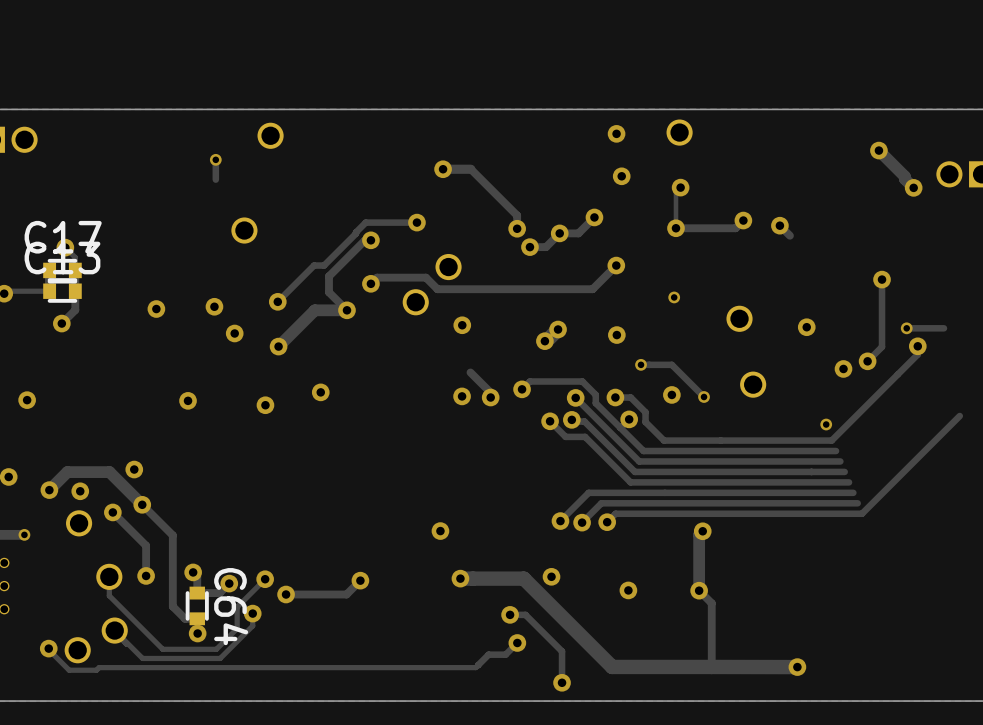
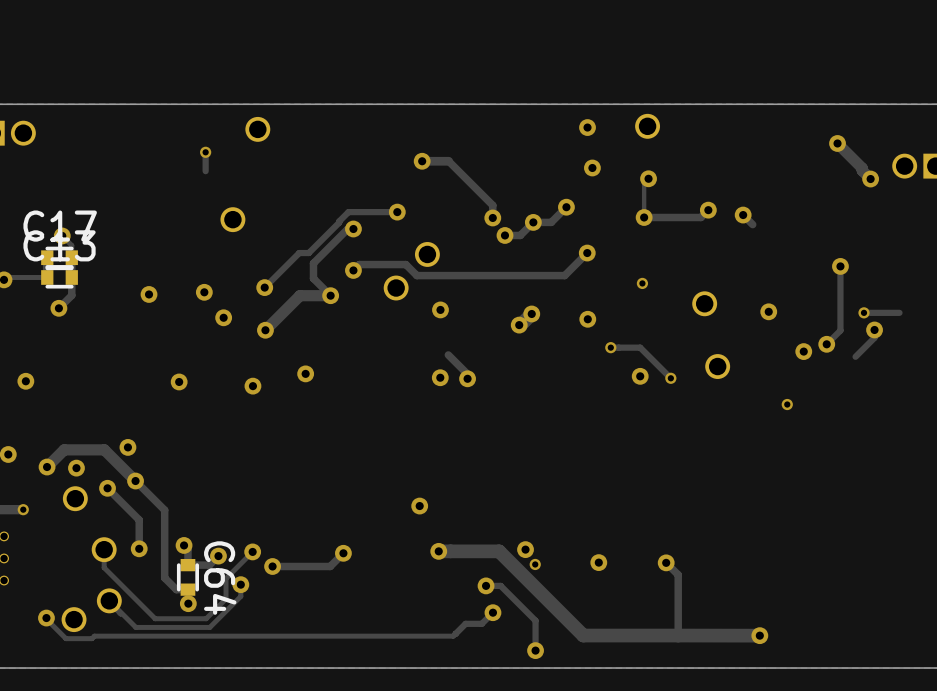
track: (897, 374) (831, 440) (664, 440) (645, 422) (645, 412) (630, 397) (615, 397) -> none
track: (522, 389) (529, 381) (582, 381) (595, 394) (595, 403) (643, 451) (836, 451) -> none
via: (522, 389) -> none
track: (575, 397) (639, 461) (840, 461) -> none
via: (575, 397) -> none
via: (615, 397) -> none
track: (959, 416) (862, 513) (615, 513) (607, 522) -> none
track: (571, 419) (584, 421) (634, 471) (844, 471) -> none
via: (571, 419) -> none
via: (629, 419) -> none
track: (550, 421) (565, 436) (585, 436) (630, 482) (849, 482) -> none
via: (550, 421) -> none
track: (853, 492) (588, 492) (560, 521) -> none
track: (857, 503) (601, 503) (582, 522) -> none
via: (560, 521) -> none
via: (582, 522) -> none
via: (607, 522) -> none
track: (702, 531) (699, 534) (699, 590) -> none
via: (702, 531) -> none
via: none -> (535, 564)

